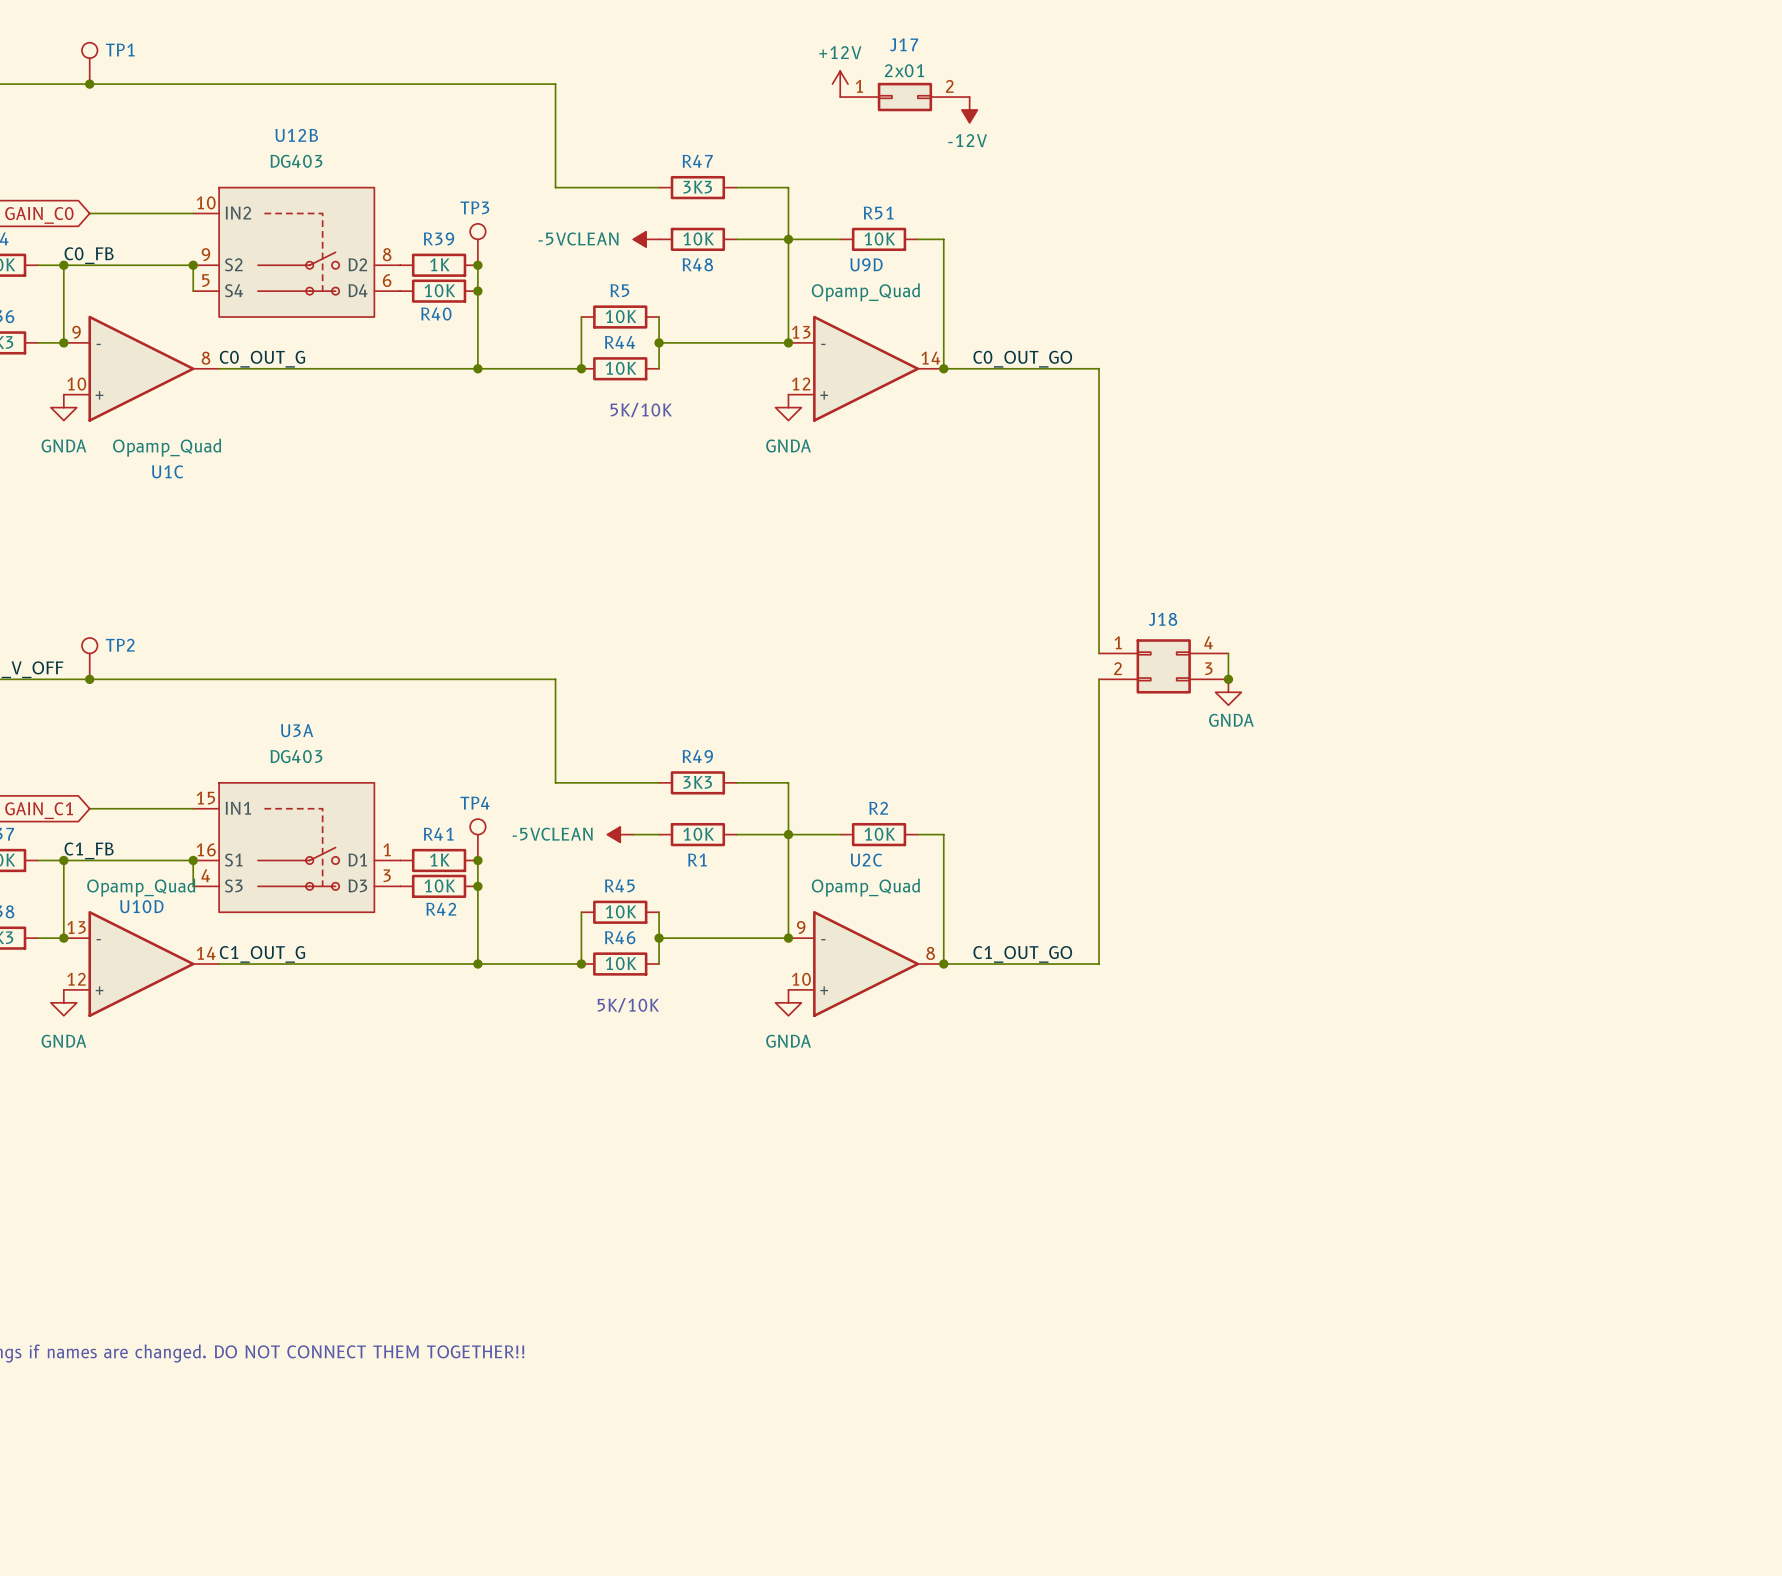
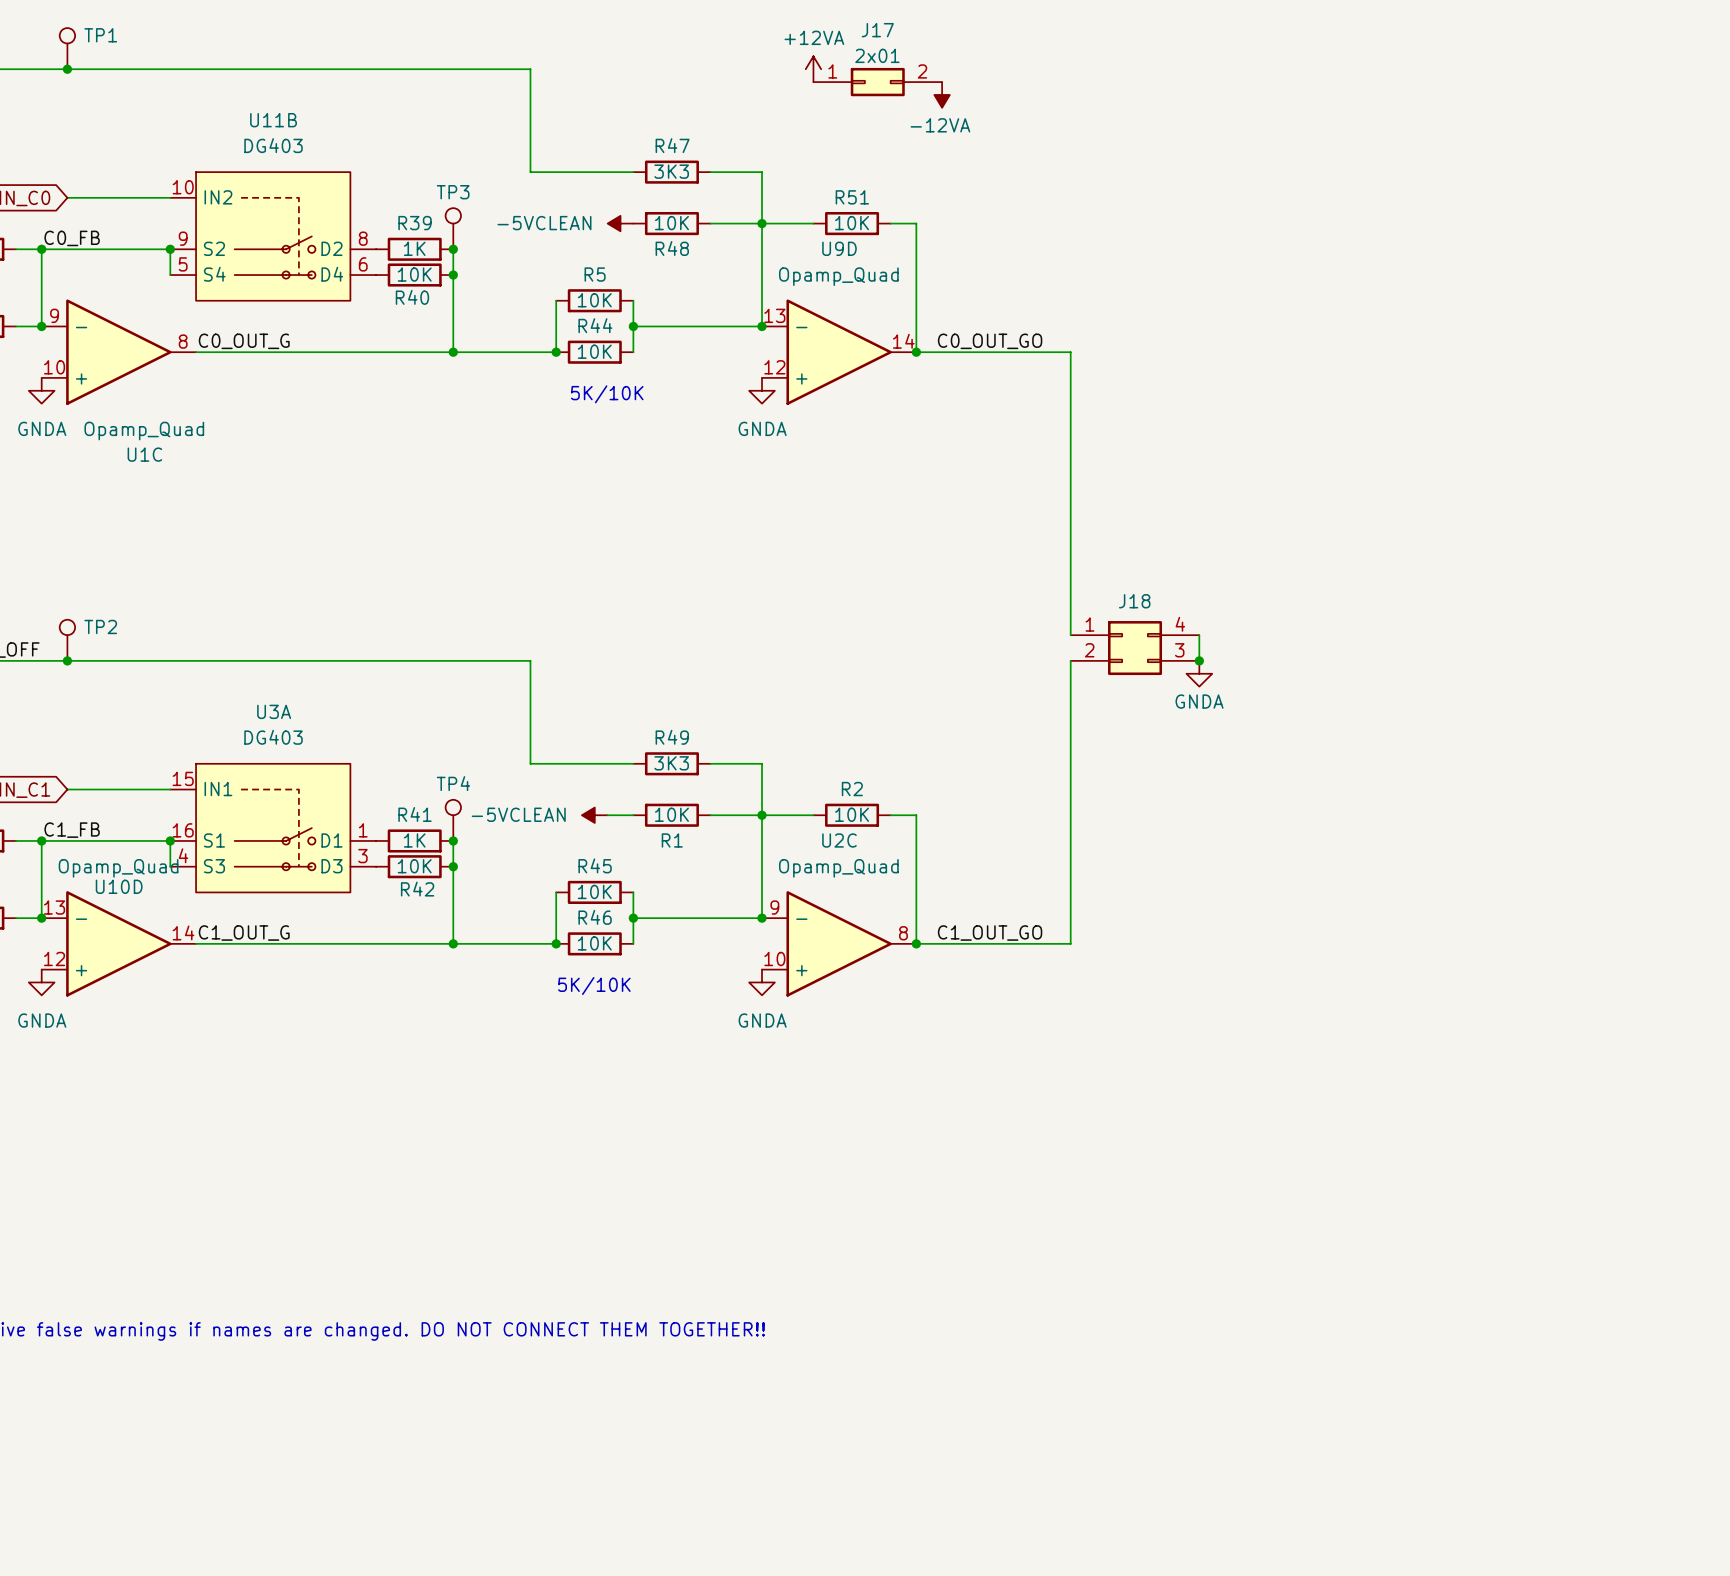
power symbol: +12V (840, 84) -> +12VA (813, 69)
power symbol: -12V (969, 109) -> -12VA (942, 94)
U12B name: U12B (296, 135) -> U11B (273, 120)

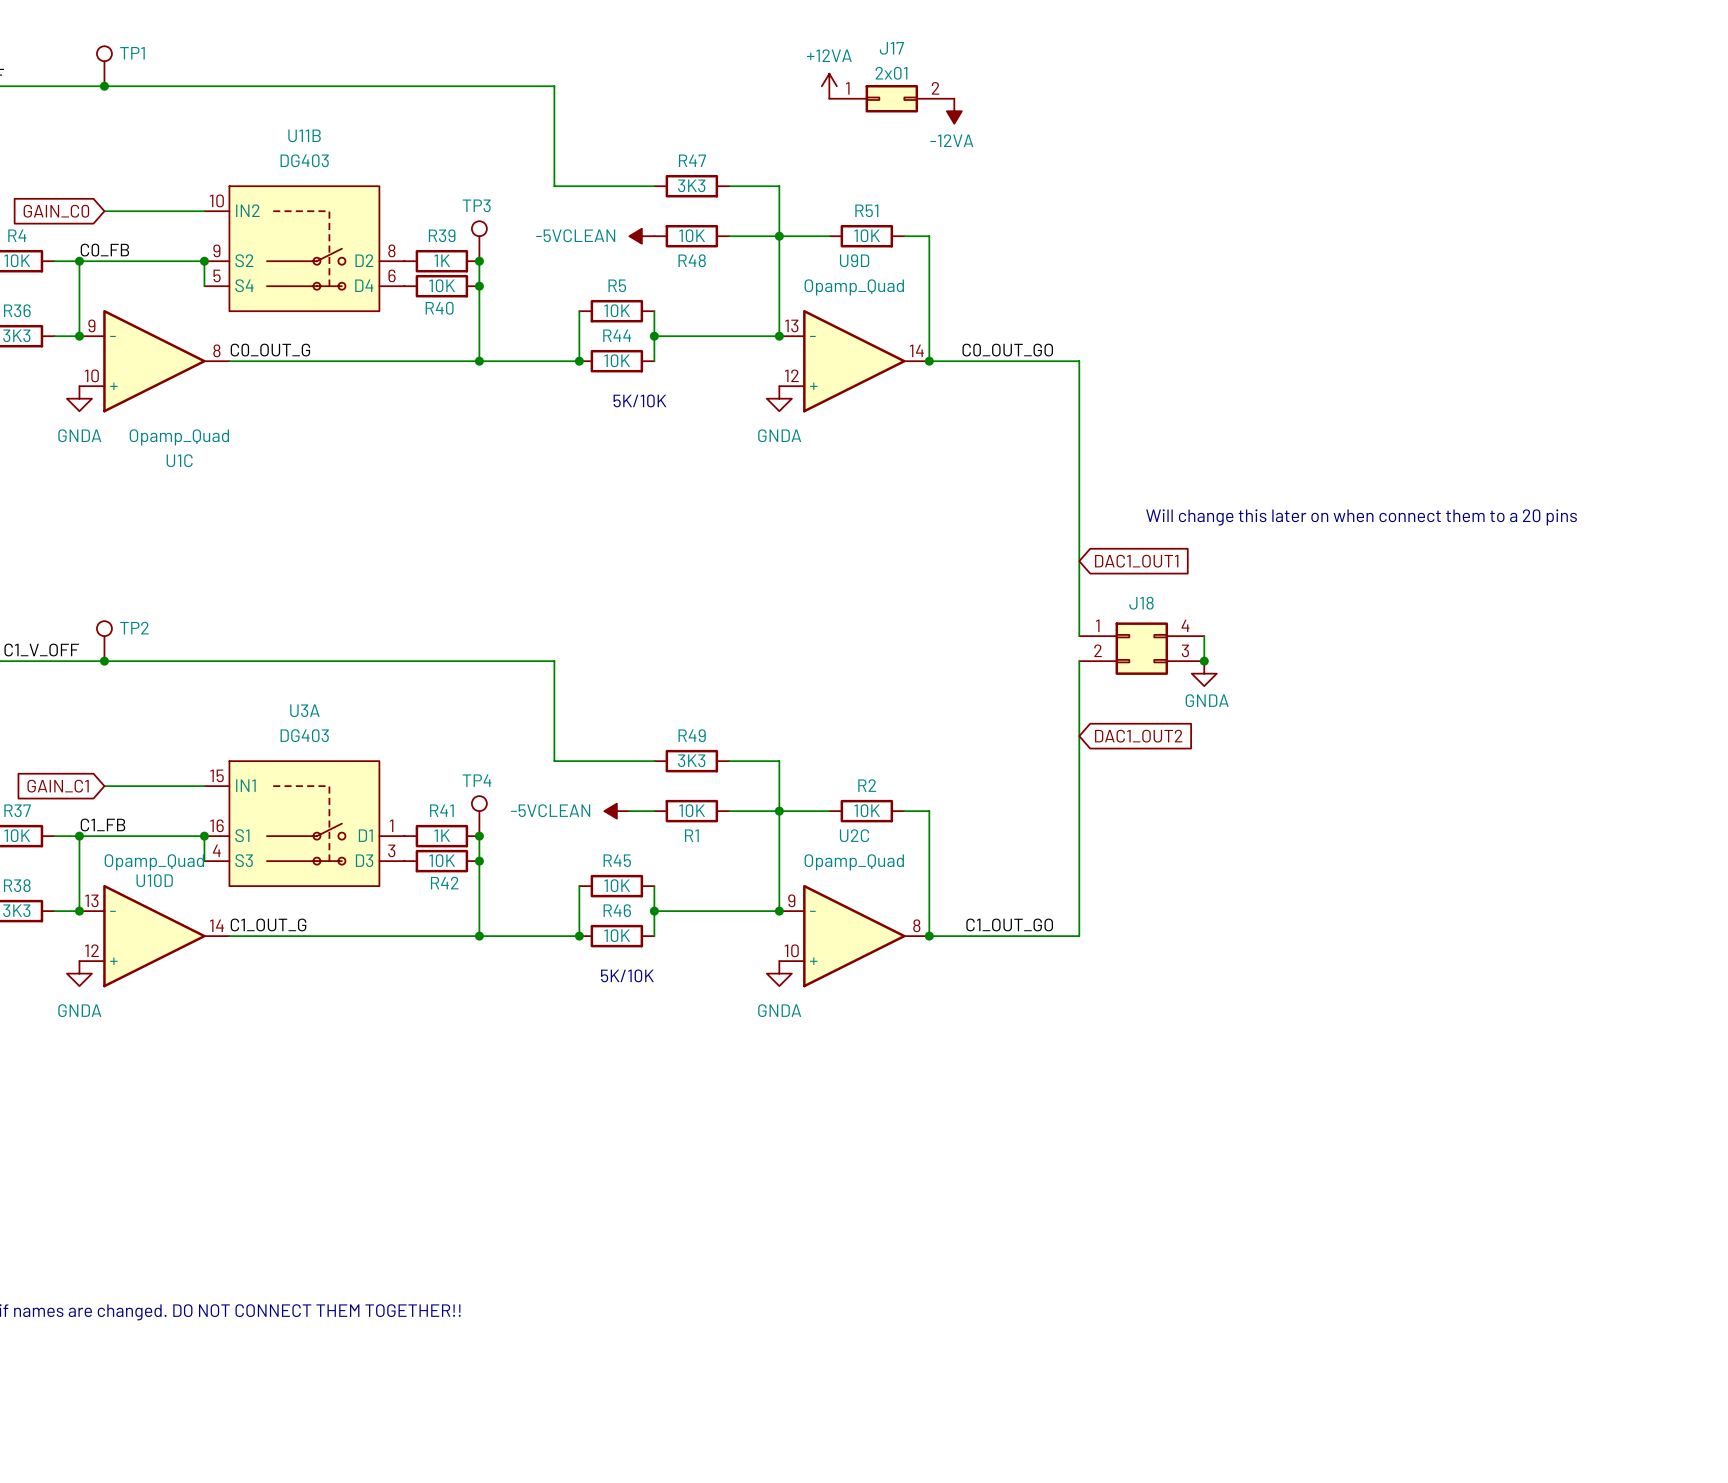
text: none -> Will change this later on when connect them to a 20 pins (1361, 517)
global label: none -> DAC1_OUT1 (1136, 561)
global label: none -> DAC1_OUT2 (1138, 736)

